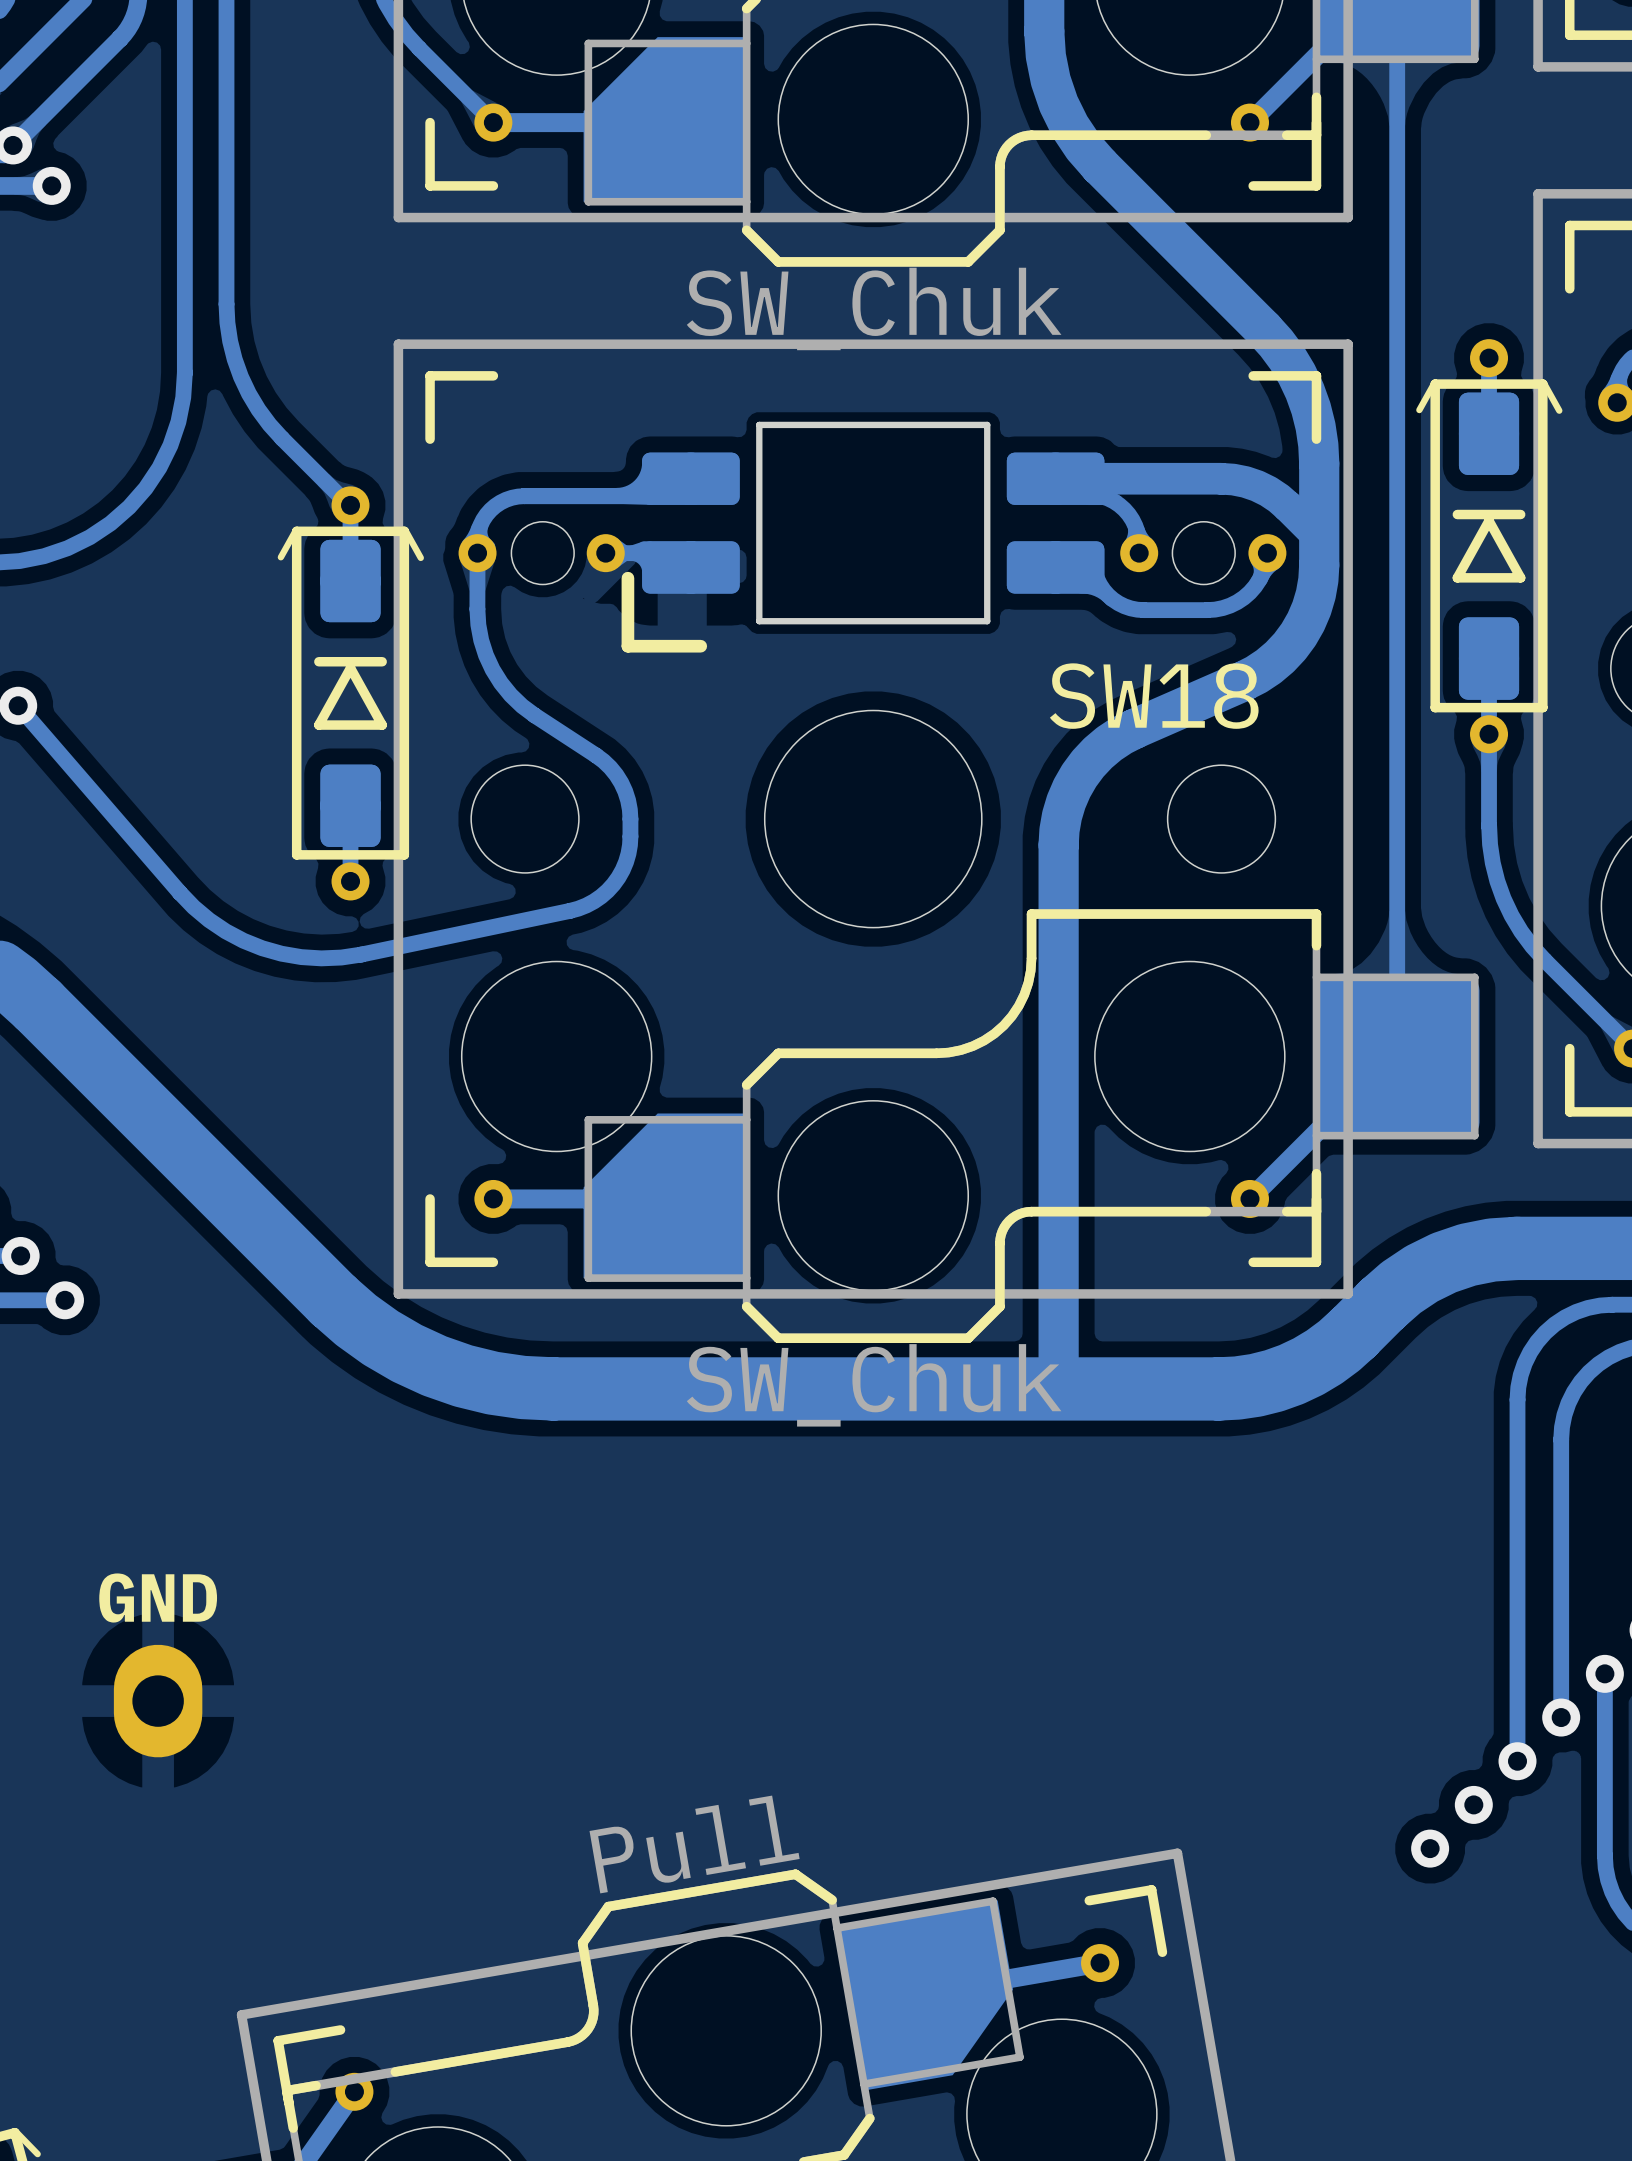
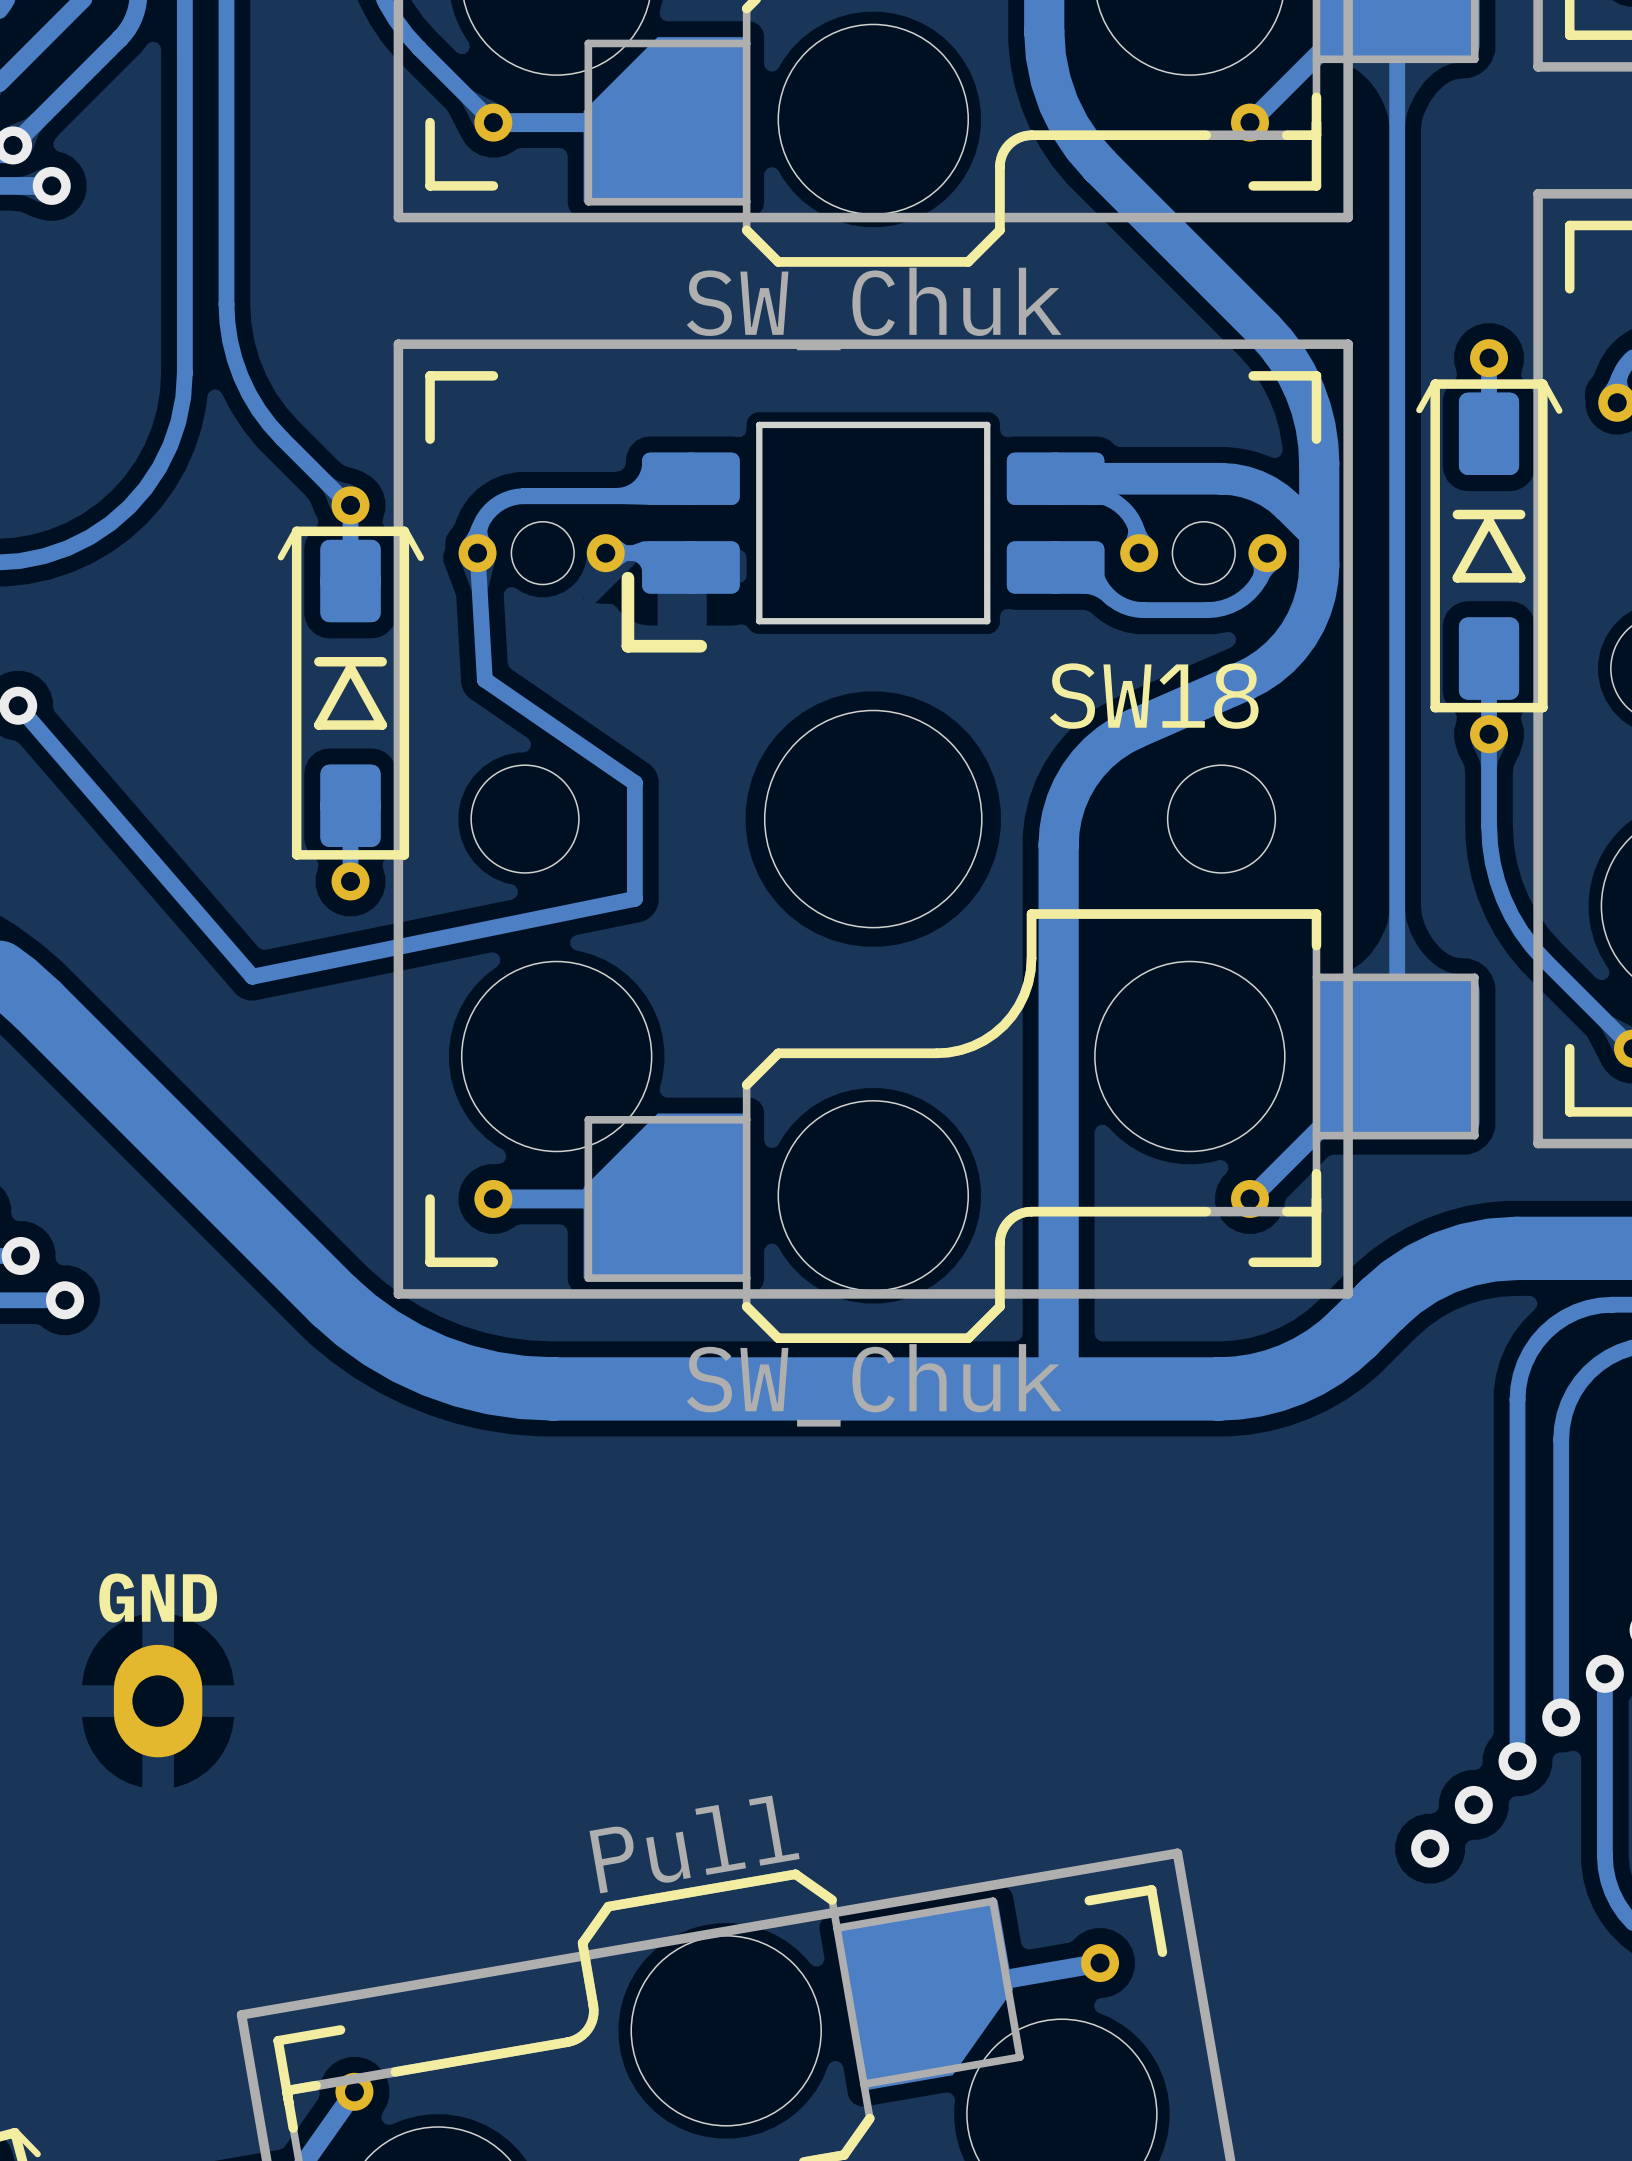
track: (477, 553) (478, 624) (485, 655) (492, 669) (500, 682) (522, 706) (603, 761) (616, 774) (625, 791) (629, 809) (629, 845) (622, 869) (613, 884) (594, 901) (570, 910) (361, 954) (321, 958) (281, 953) (243, 940) (209, 920) (179, 892) -> (477, 553) (484, 679) (634, 783) (634, 898) (252, 976) (179, 892)

